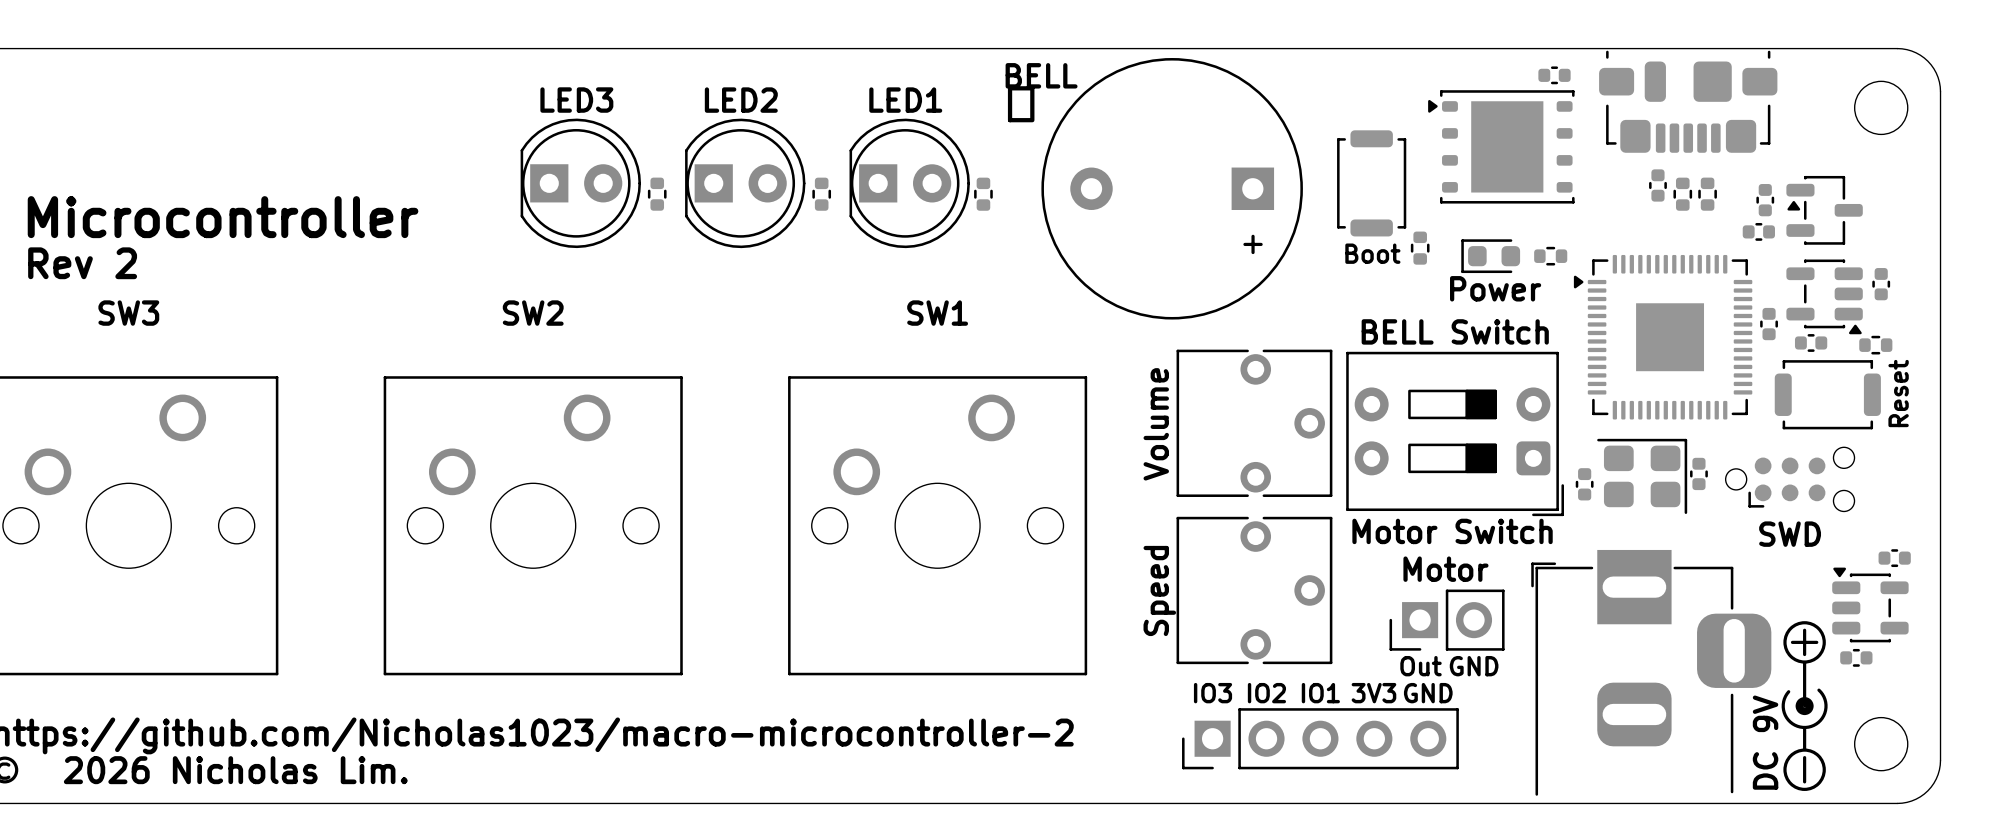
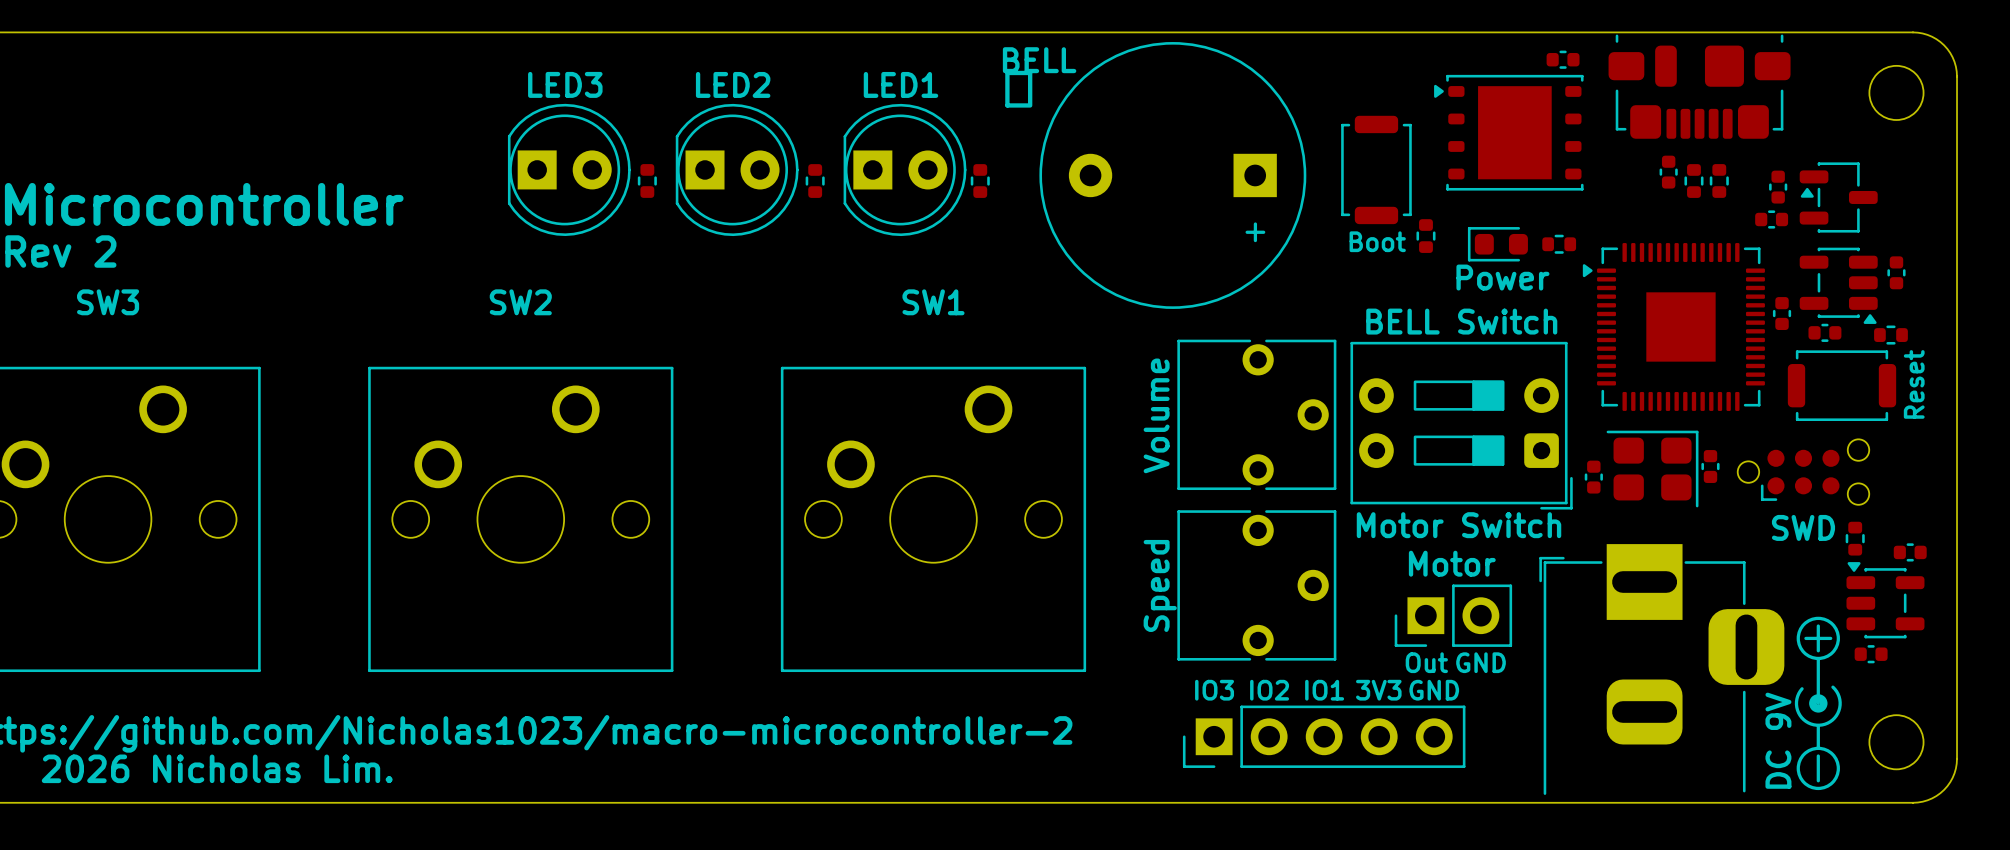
part: none -> (1855, 538)

